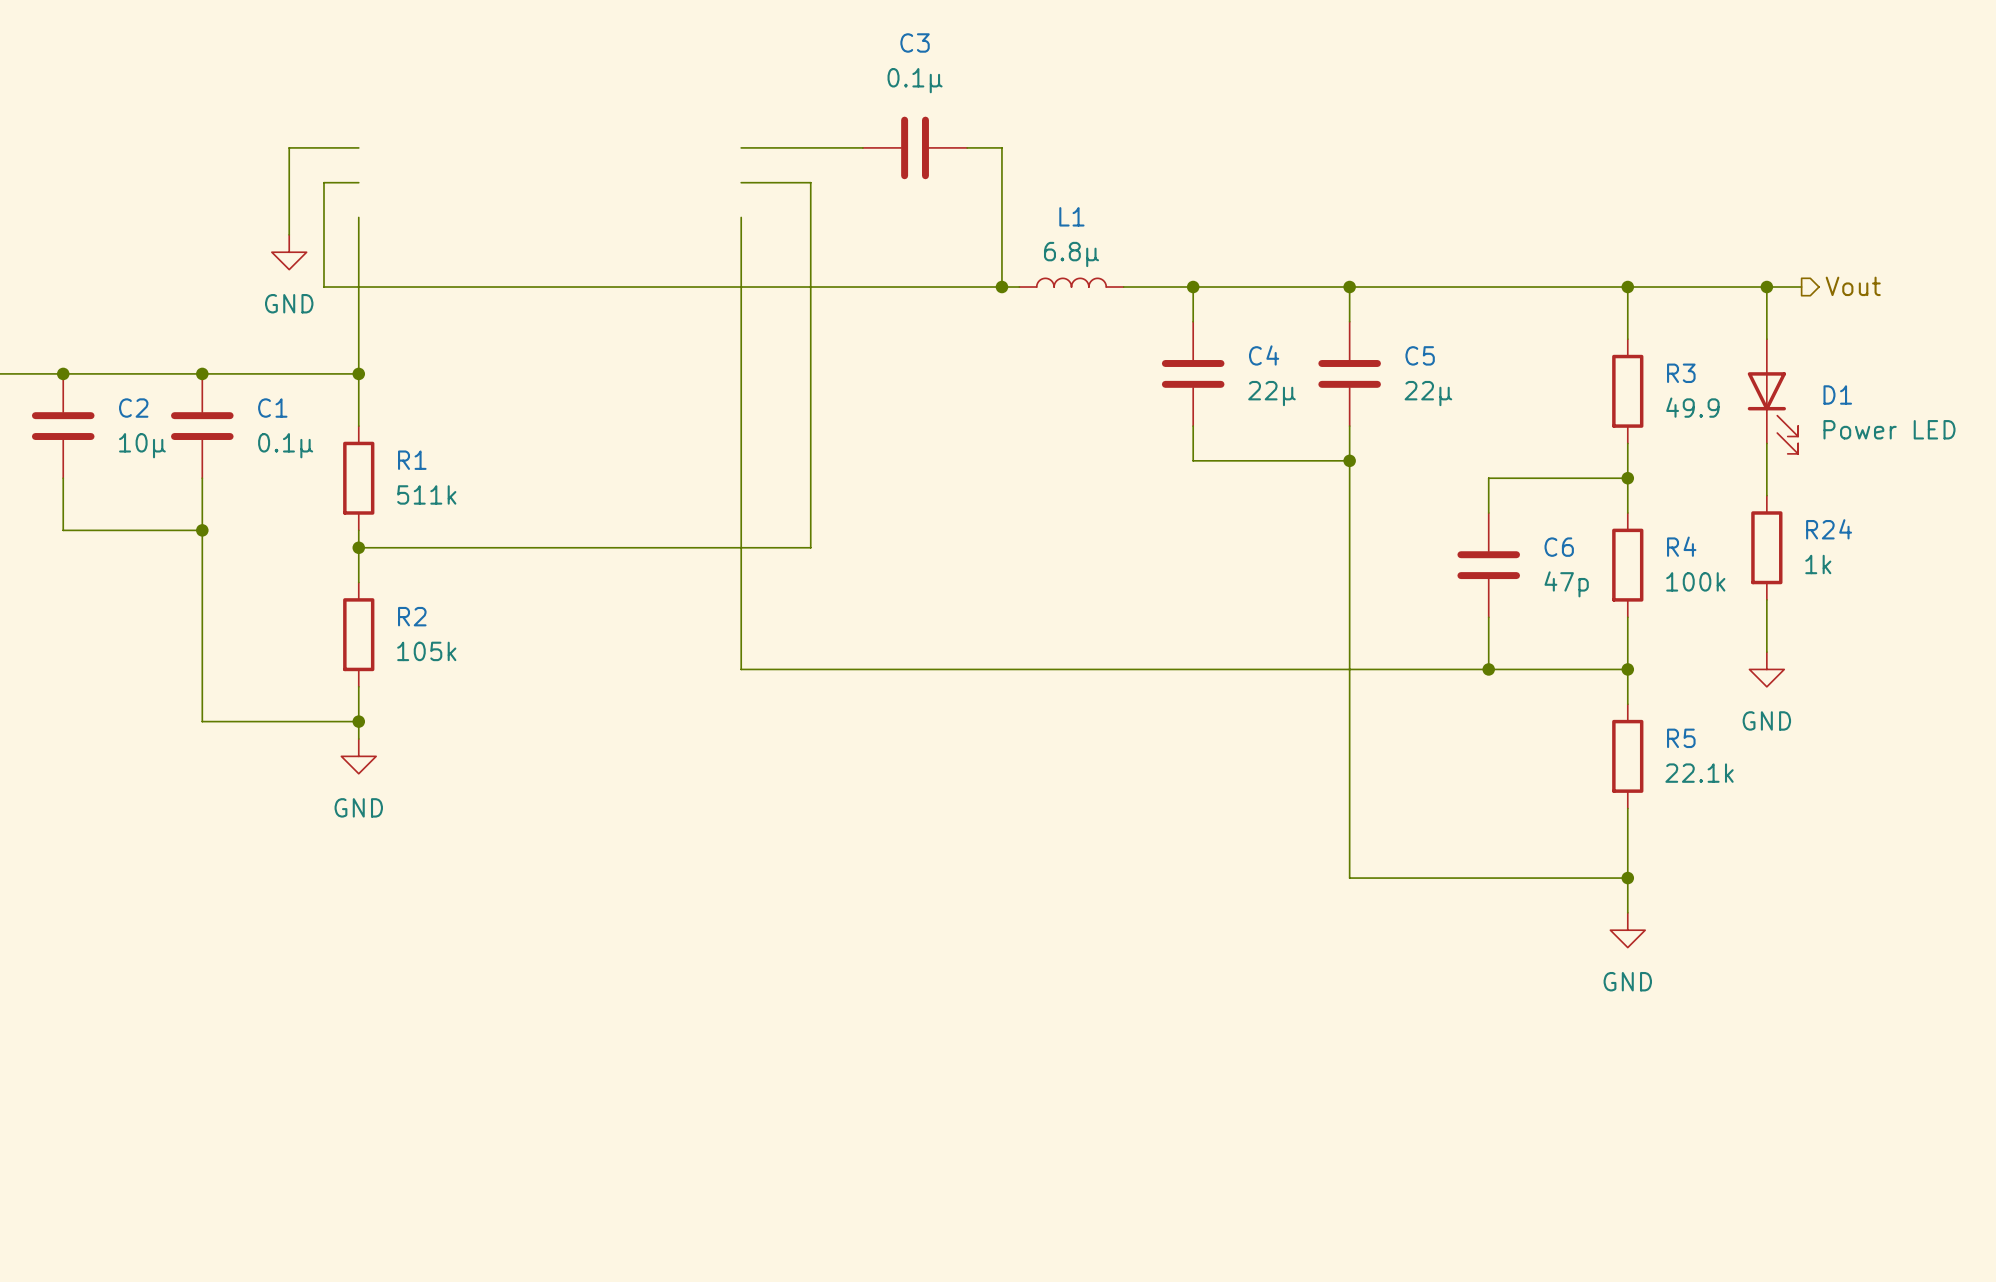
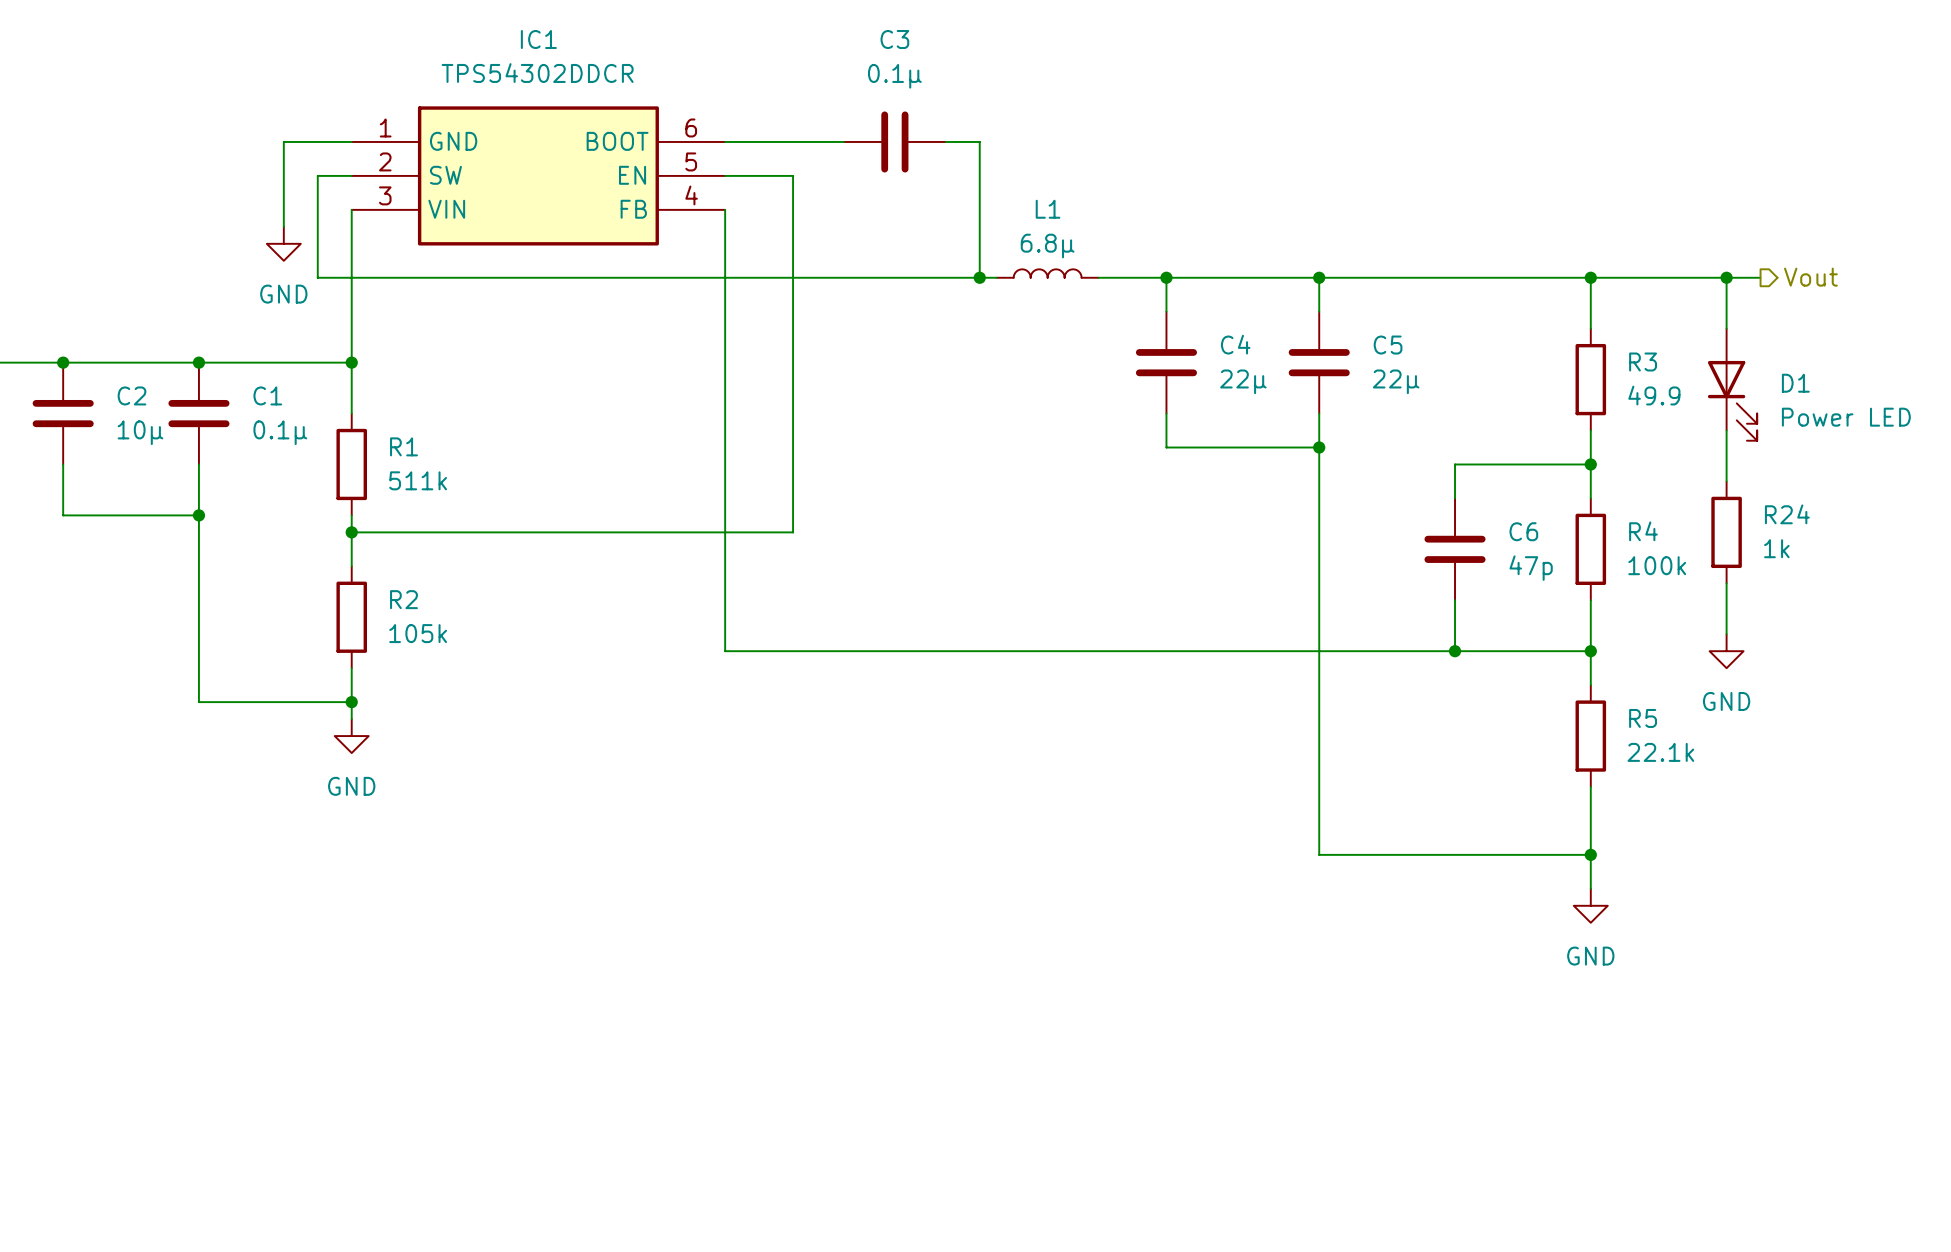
IC1: none -> TPS54302DDCR (538, 175)

